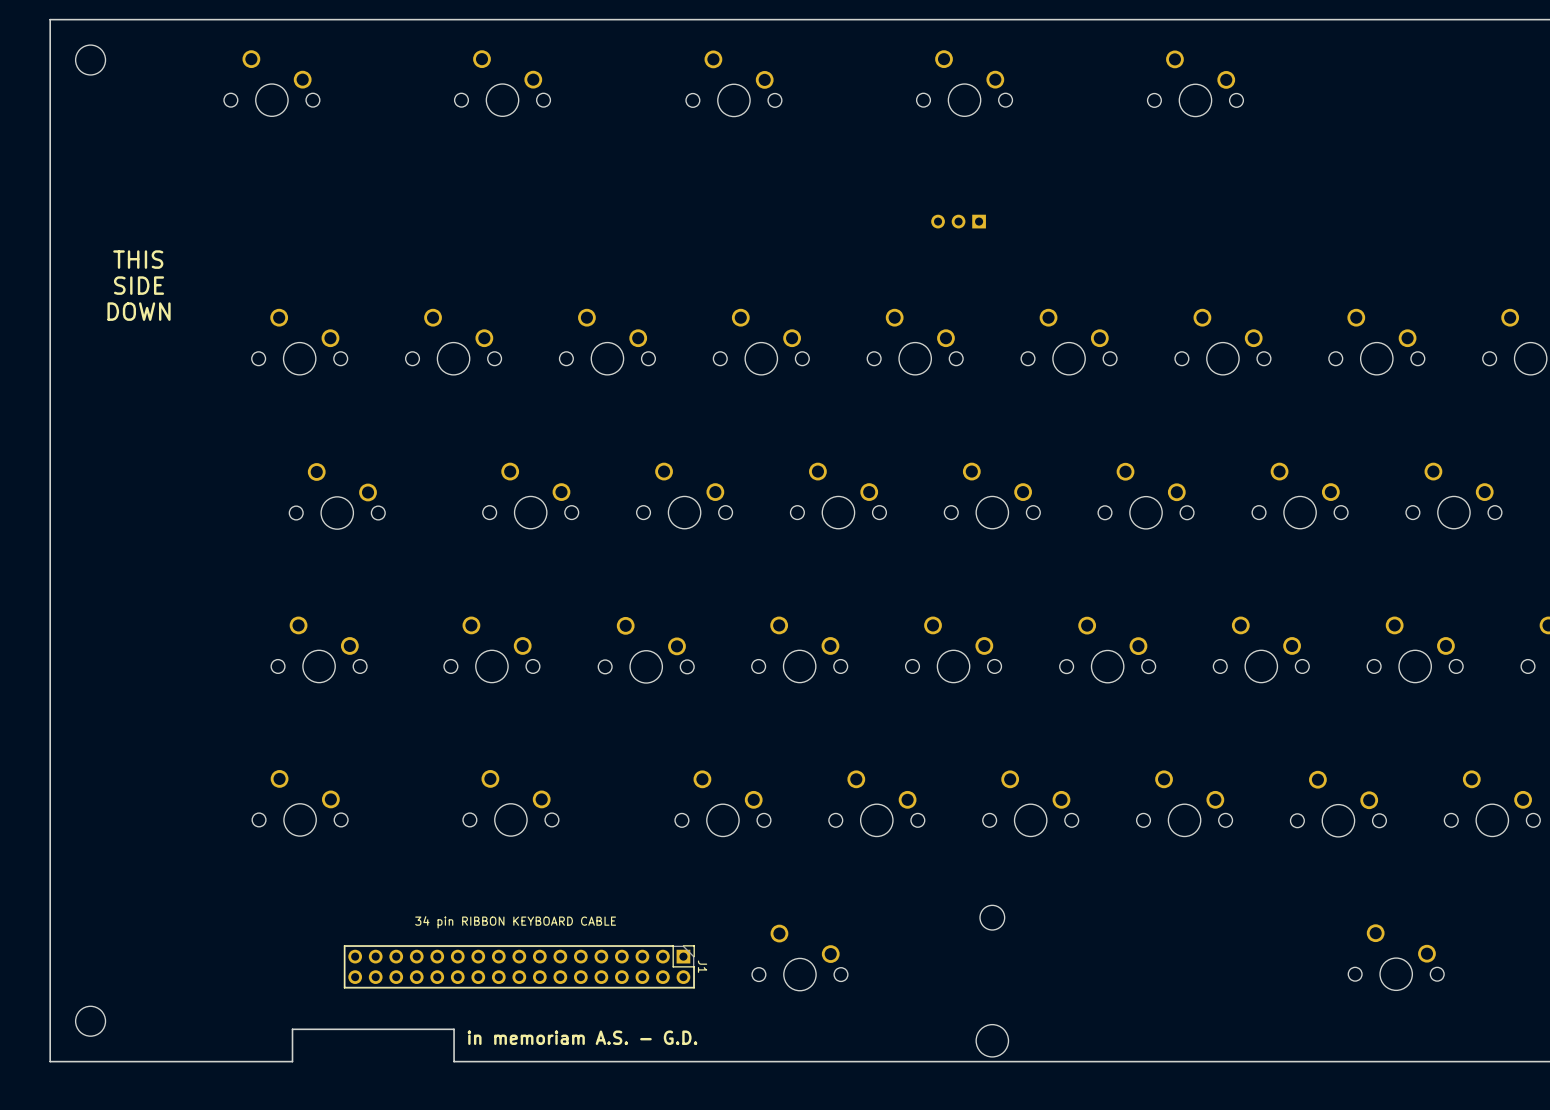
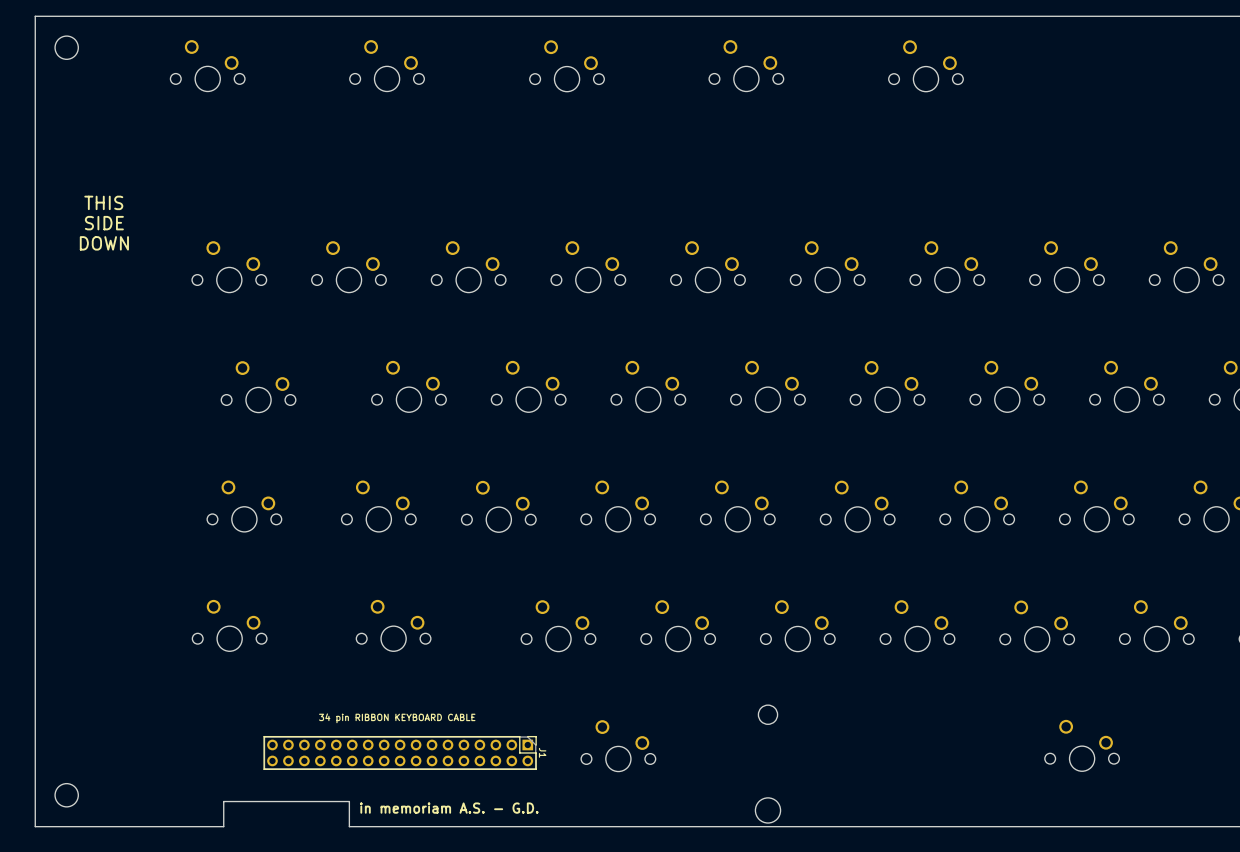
part: (958, 221) -> none

